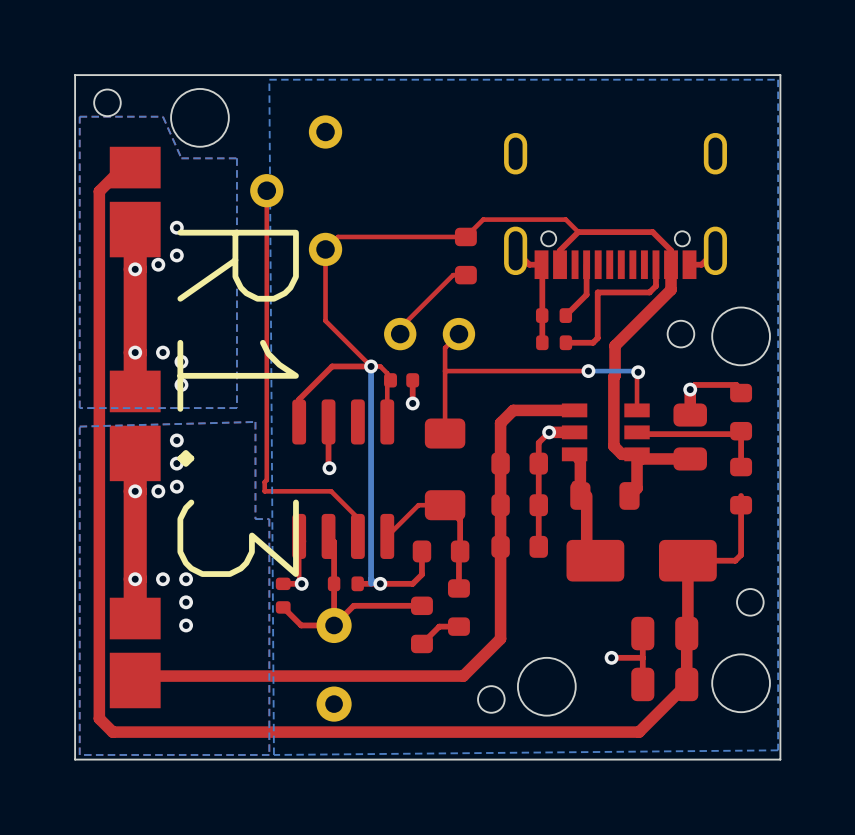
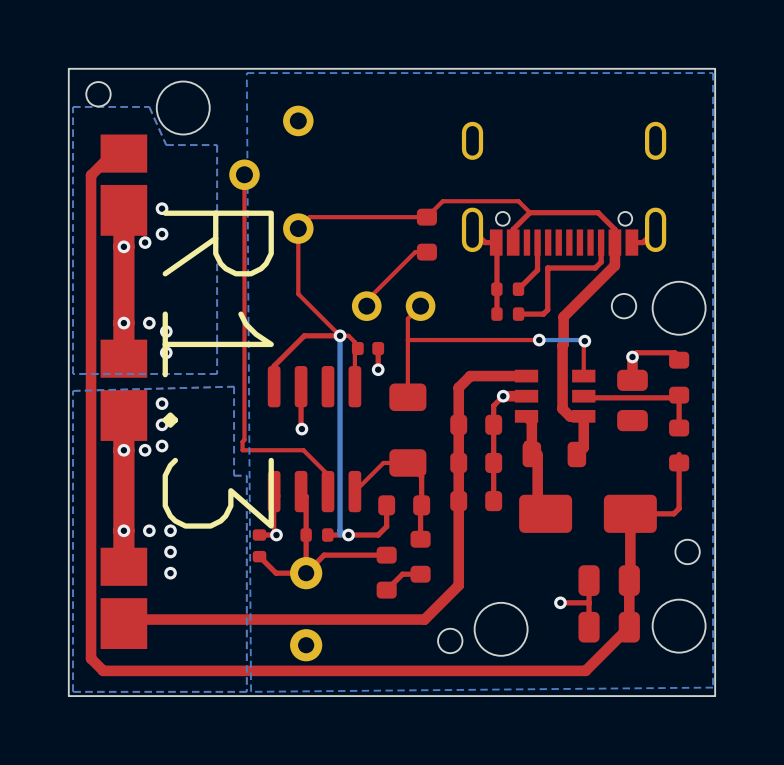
top track: (637, 454) (641, 458) (690, 458) -> none

